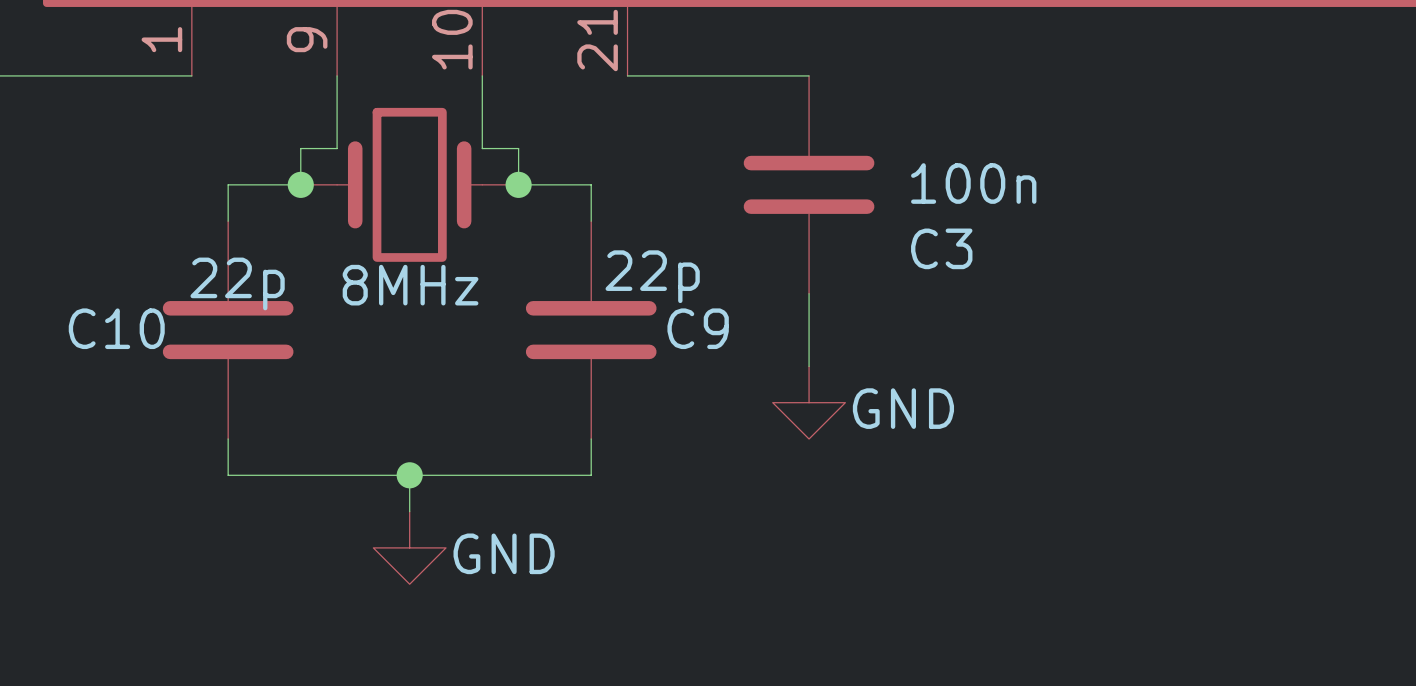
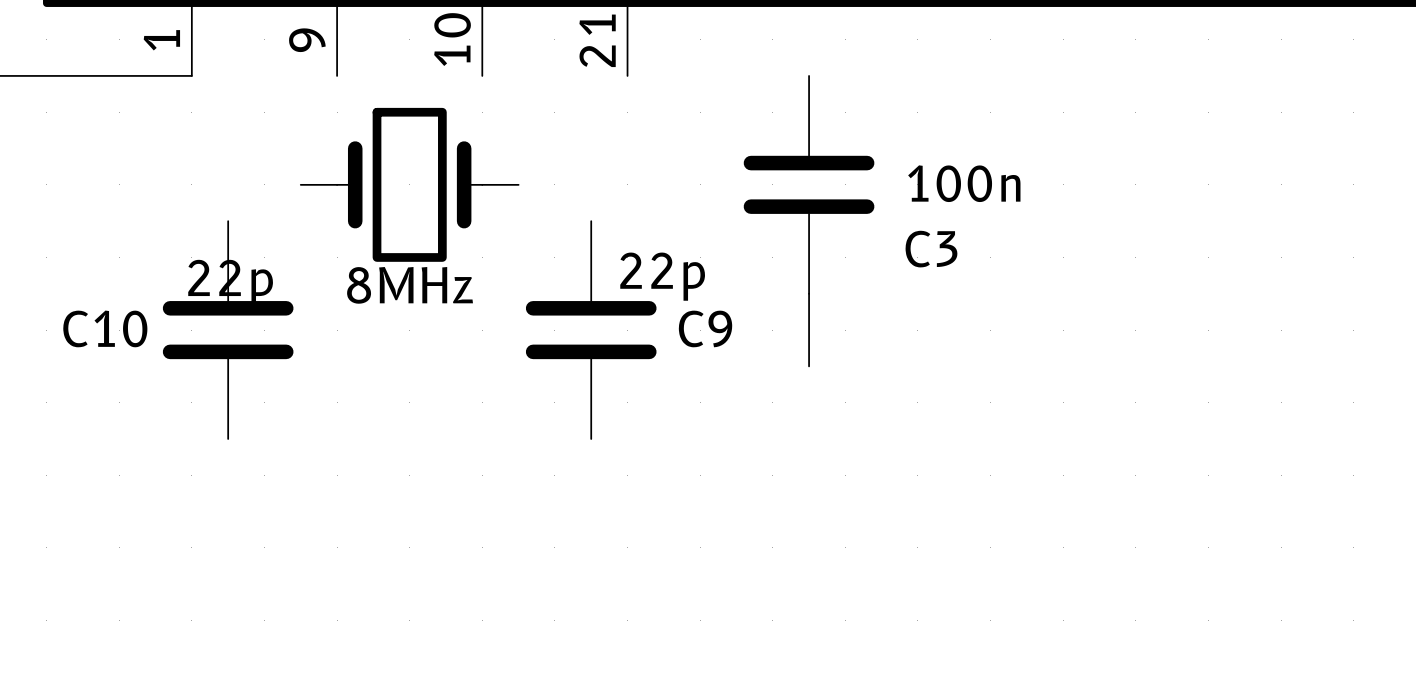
wire: (337, 75) (337, 148) (300, 148) (300, 184) (228, 184) (228, 221) -> none
wire: (482, 75) (482, 148) (518, 148) (518, 184) (591, 184) (591, 221) -> none
wire: (627, 75) (809, 75) -> none
junction: (300, 184) -> none
junction: (518, 184) -> none
power symbol: GND (809, 402) -> none
wire: (228, 439) (228, 475) (591, 475) (591, 439) -> none
wire: (409, 475) (409, 511) -> none
junction: (409, 475) -> none
power symbol: GND (409, 547) -> none

